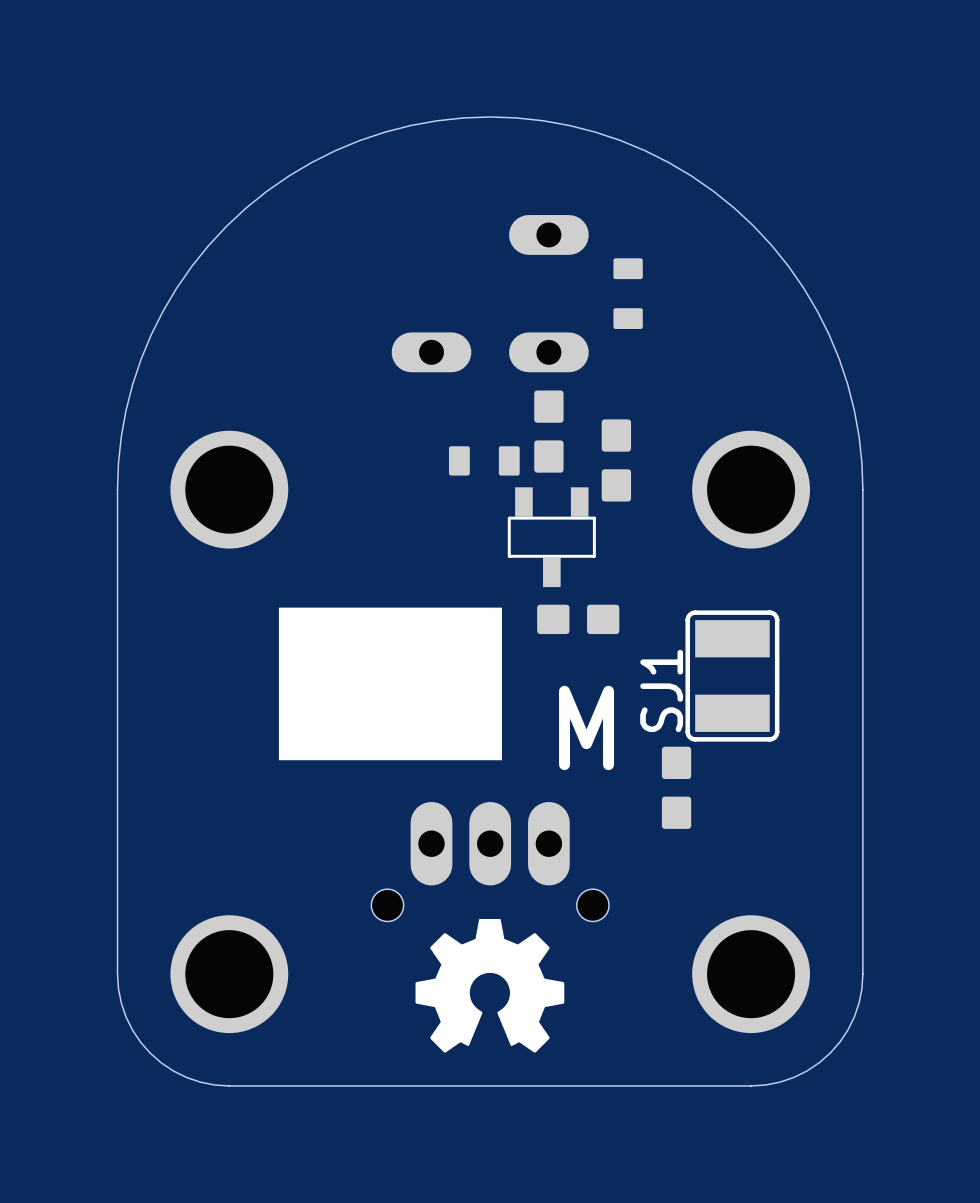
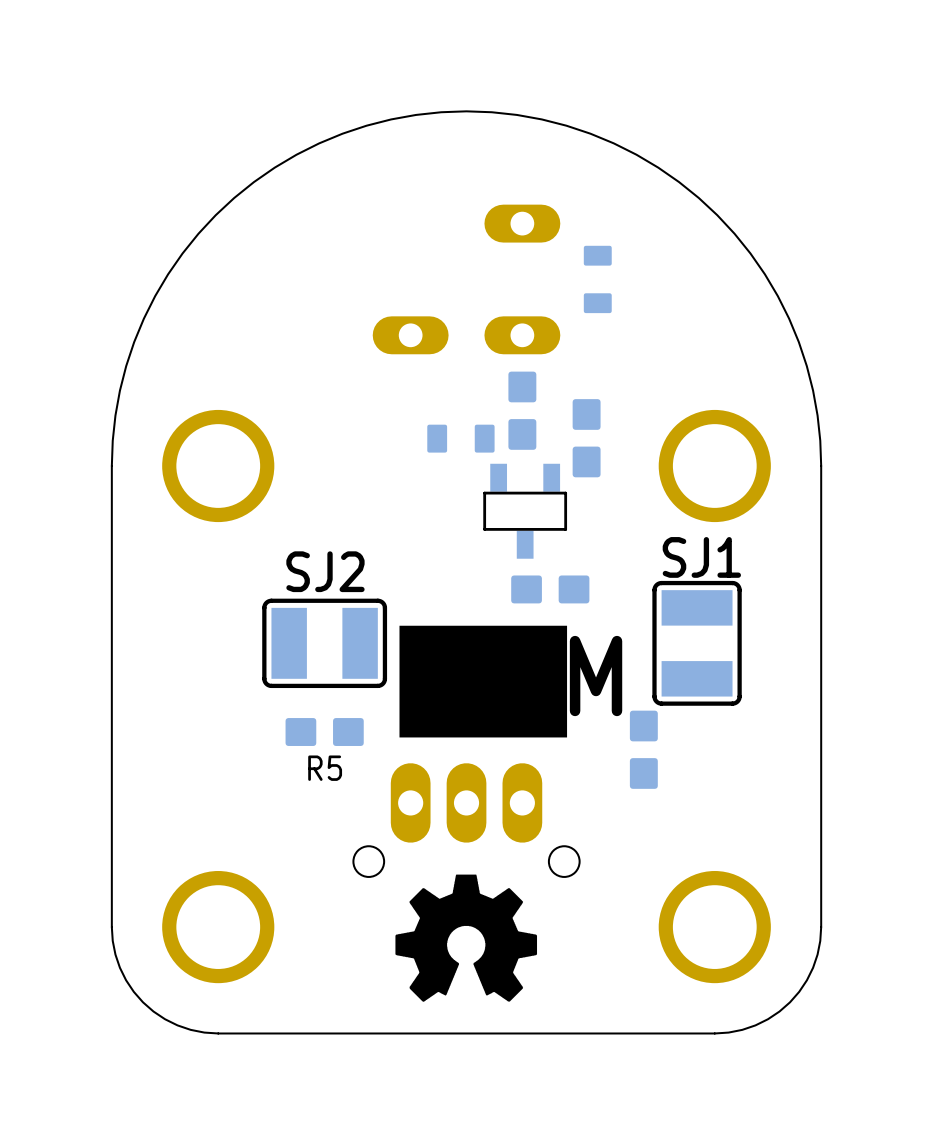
text: none -> SJ2 (325, 571)
drawing: [278, 607, 502, 761] -> none
drawing: none -> [399, 625, 568, 738]
part: none -> (324, 643)
SJ1 name rotation: 0° (661, 690) -> 90° clockwise (701, 557)
SJ1 name position: SJ1 (661, 690) -> SJ1 (701, 557)
text position: M (586, 727) -> M (596, 676)
R5: none -> (324, 732)

